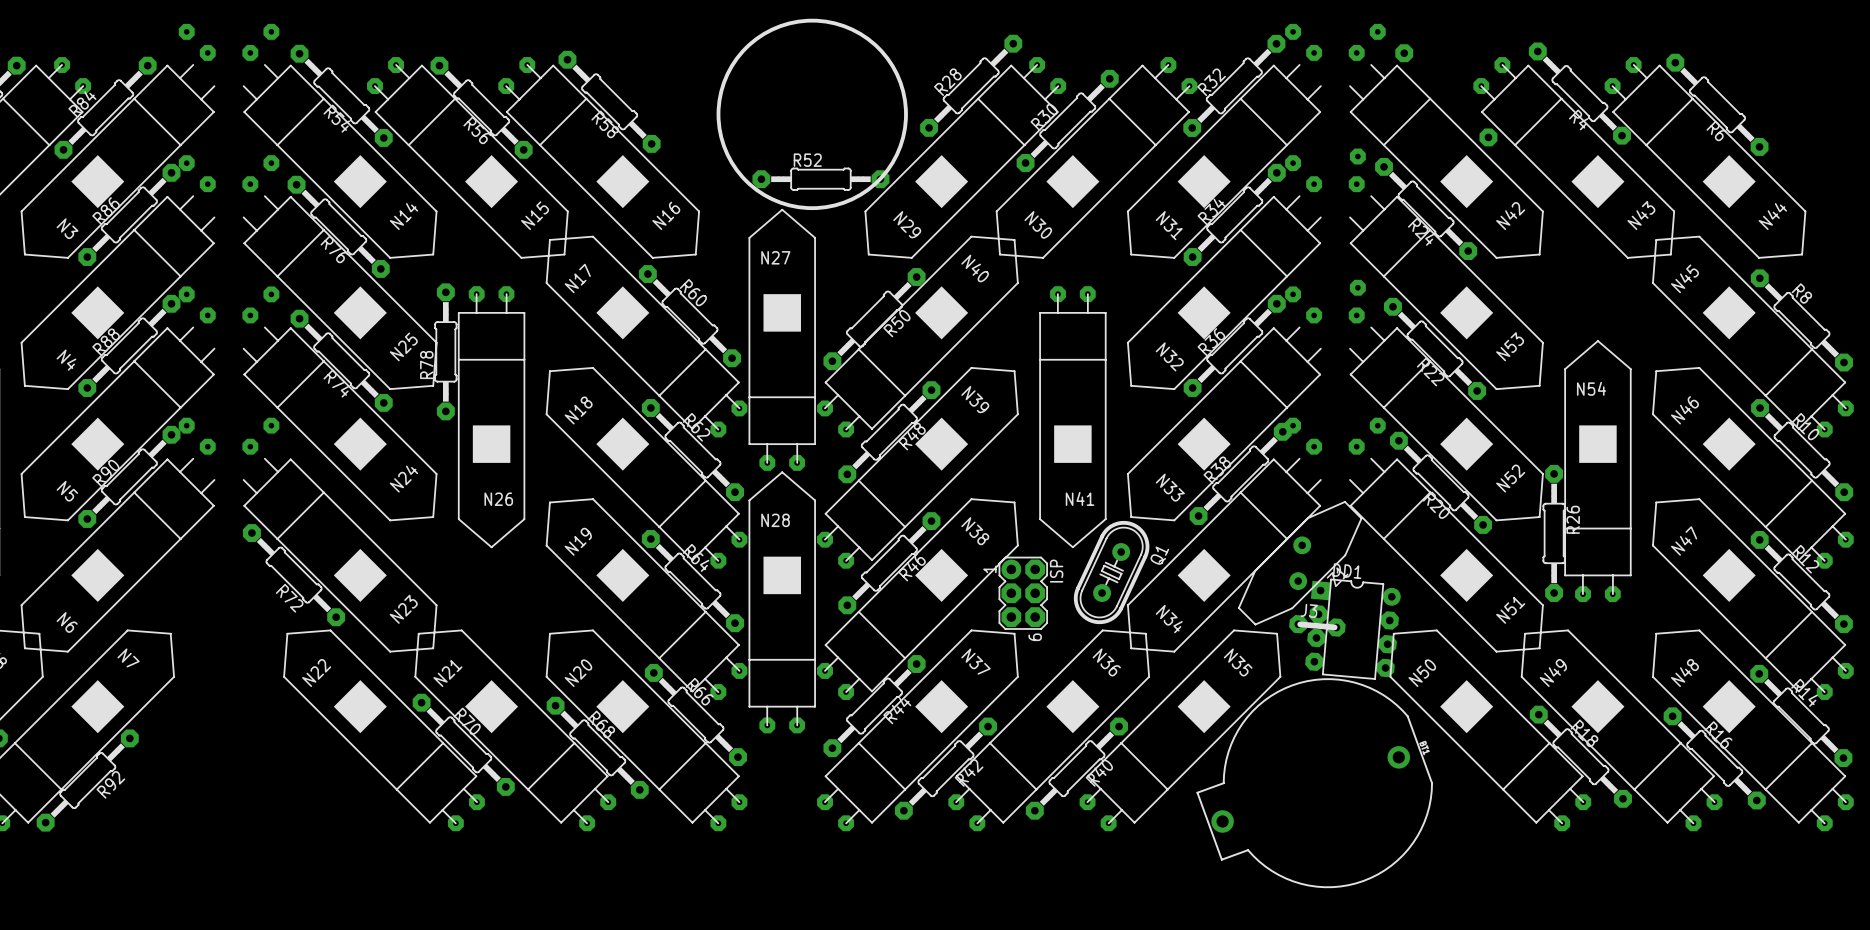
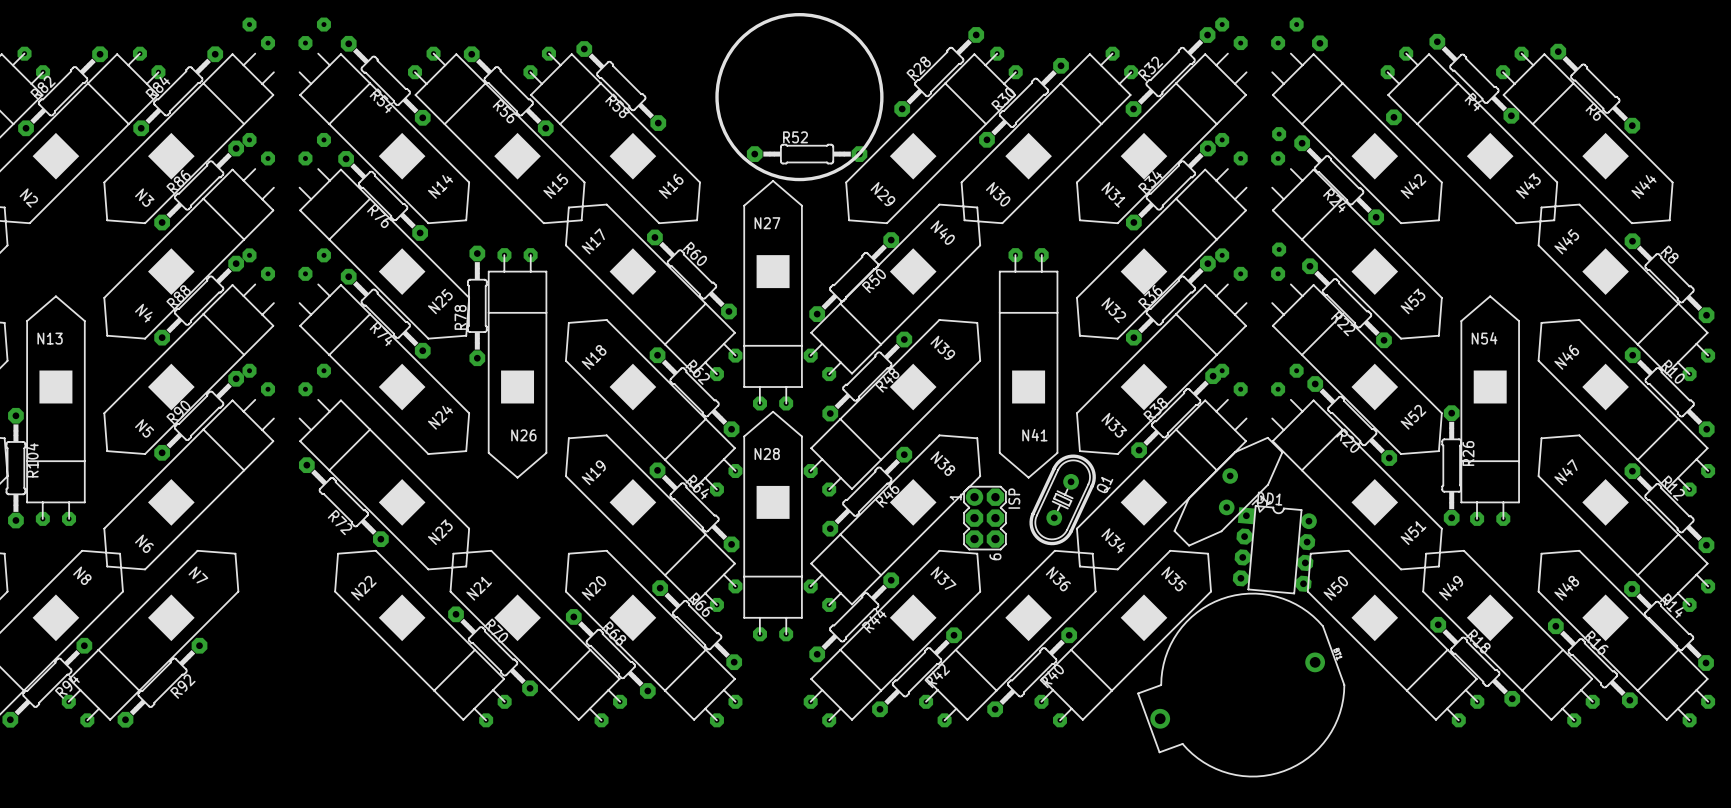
J3: (1317, 625) -> none

